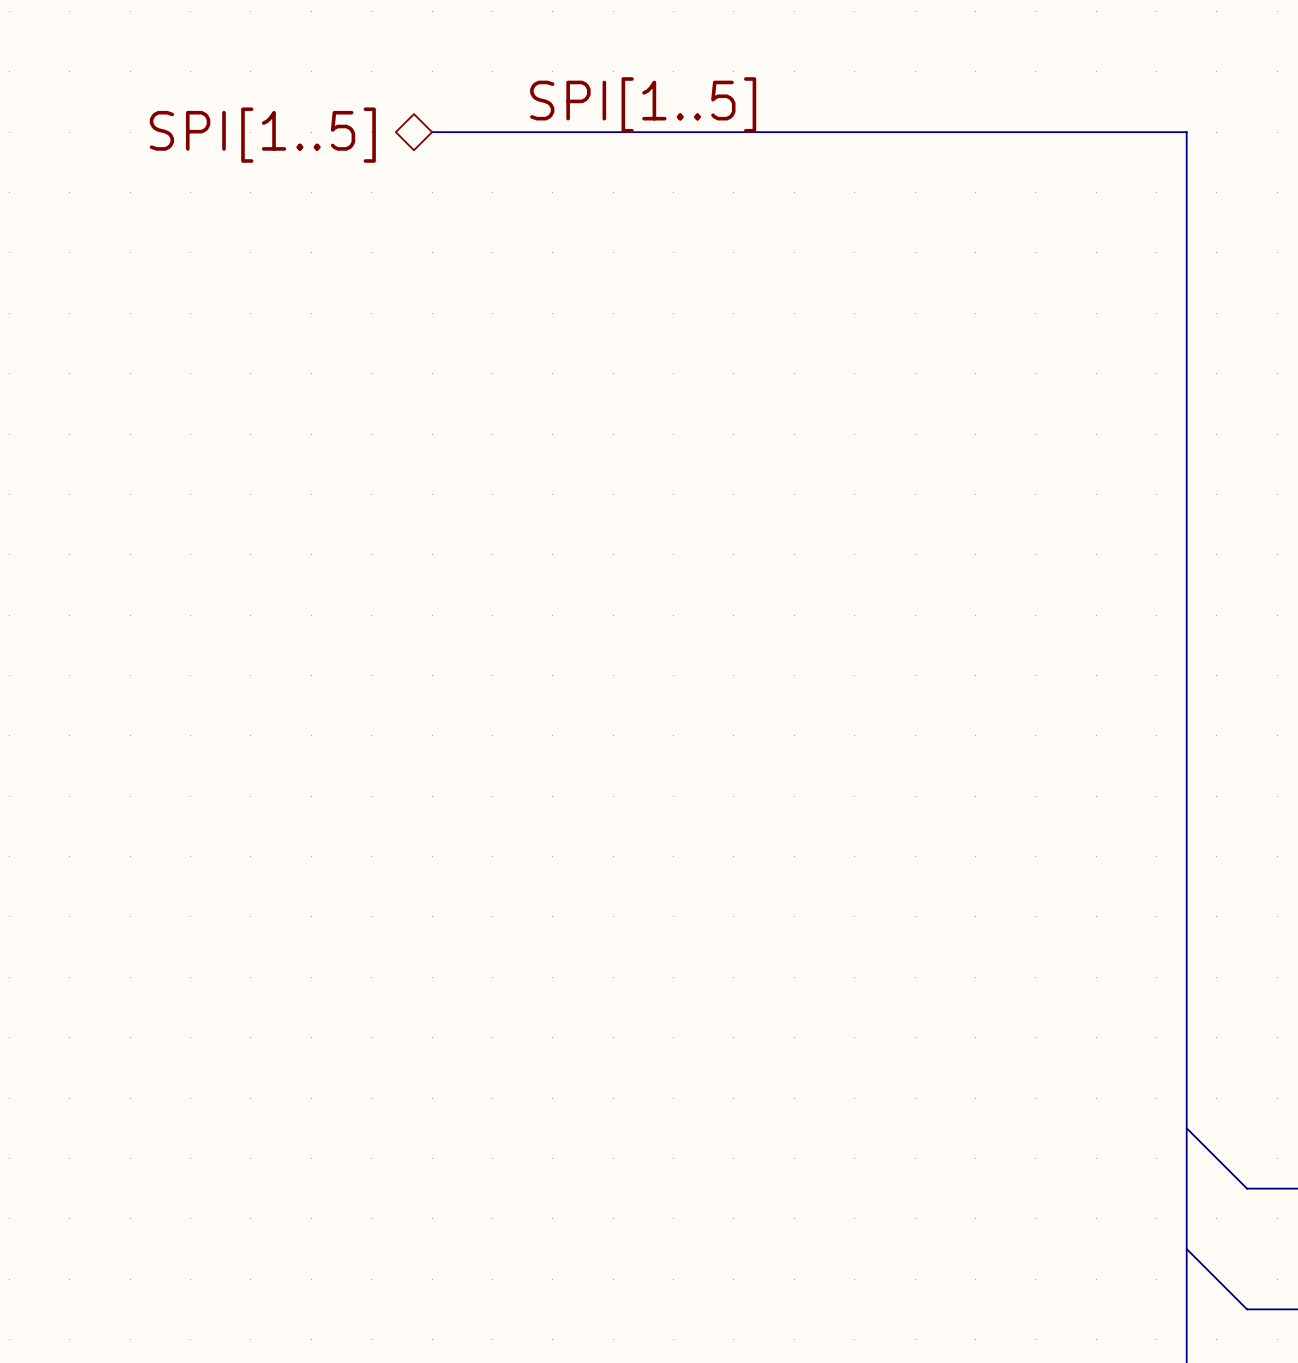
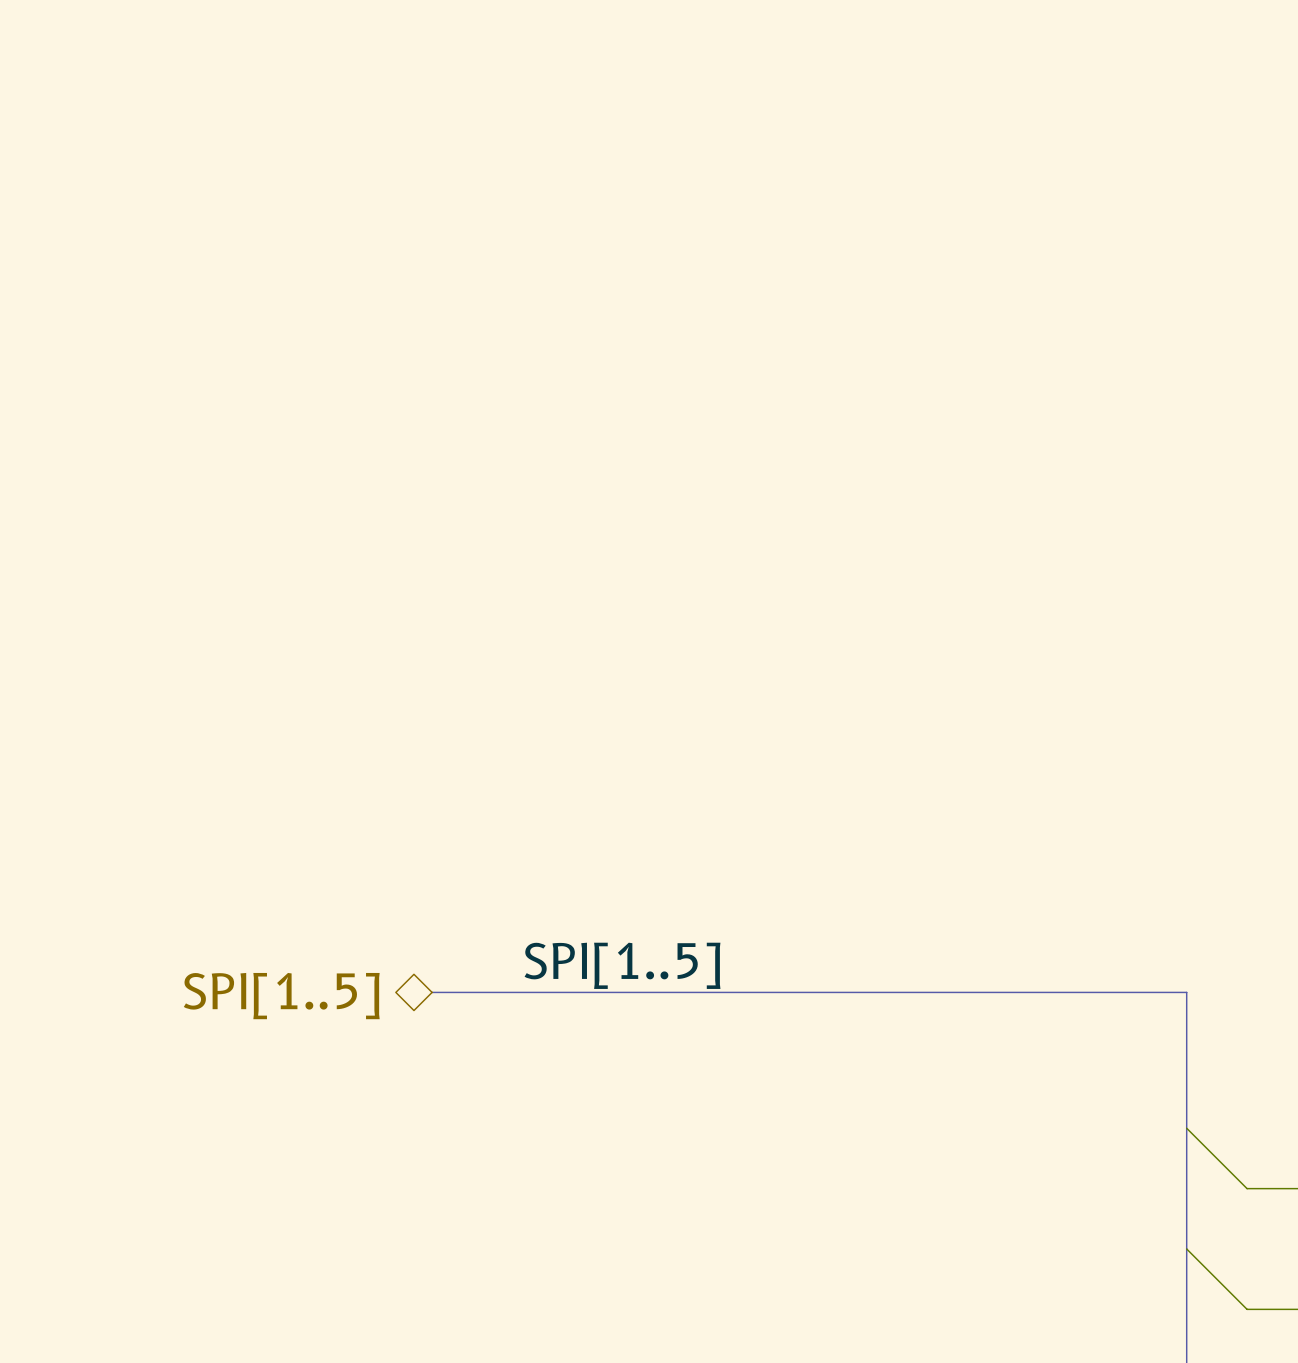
label: SPI[1..5] (643, 104) -> none
bus: (432, 132) (1186, 132) (1186, 992) -> (432, 992) (1186, 992)
hierarchical label: SPI[1..5] (262, 135) -> none
label: none -> SPI[1..5] (622, 965)
hierarchical label: none -> SPI[1..5] (281, 996)

